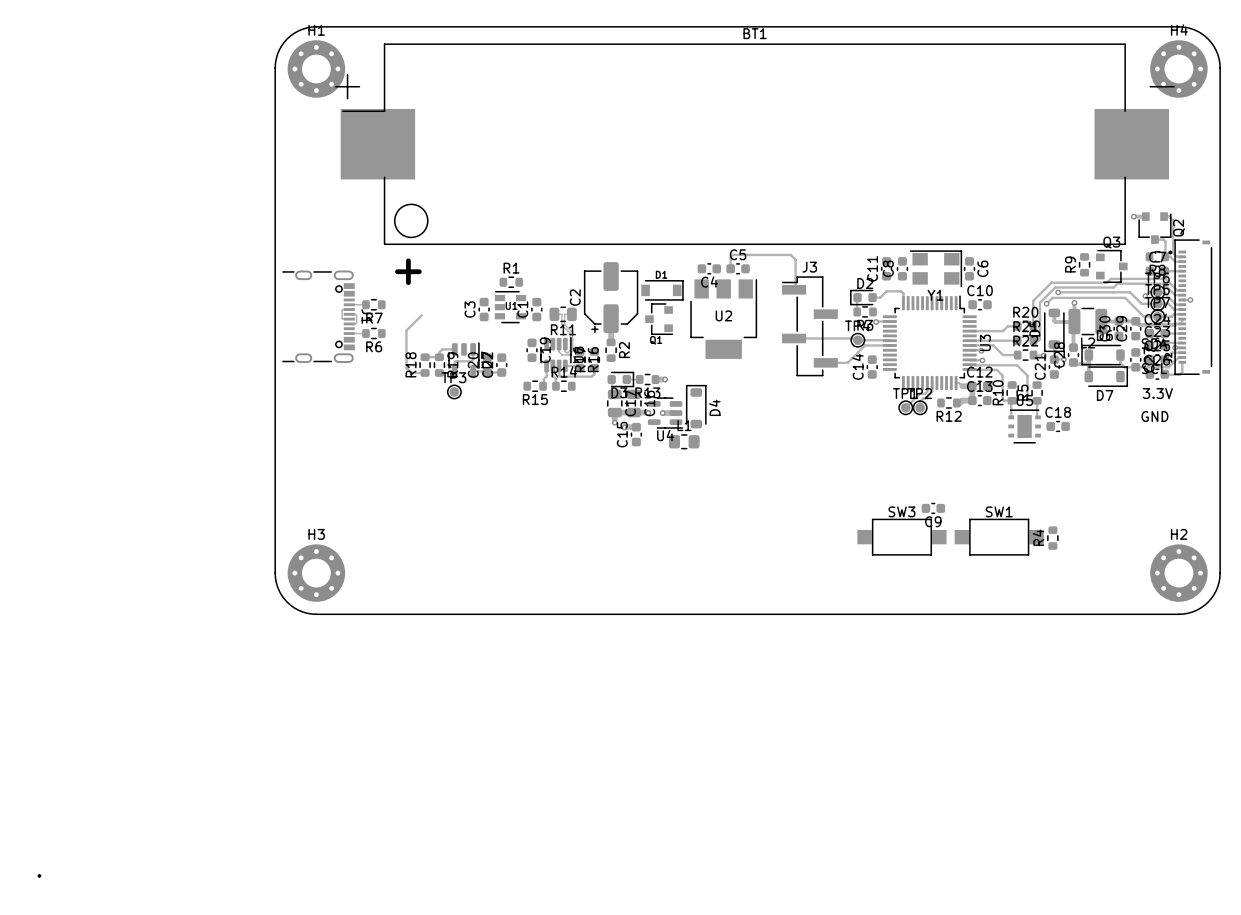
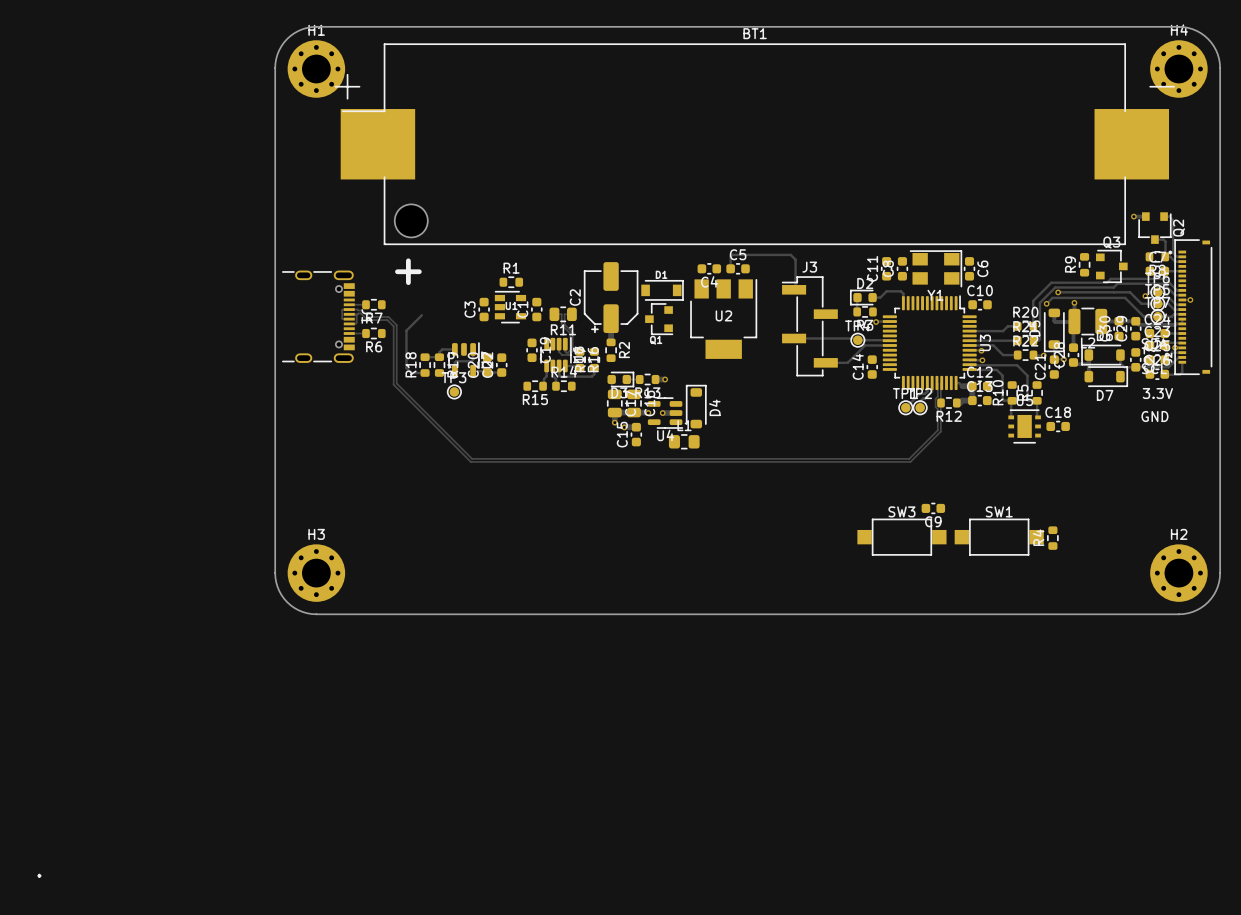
track: none -> (349, 309) (362, 310) (368, 317) (388, 317) (396, 325) (396, 383) (472, 458) (909, 458) (937, 430) (937, 409) (935, 407) (935, 398) (937, 396) (936, 382)
track: none -> (355, 314) (360, 313) (367, 320) (387, 320) (393, 326) (393, 384) (470, 461) (910, 461) (940, 431) (941, 382)

